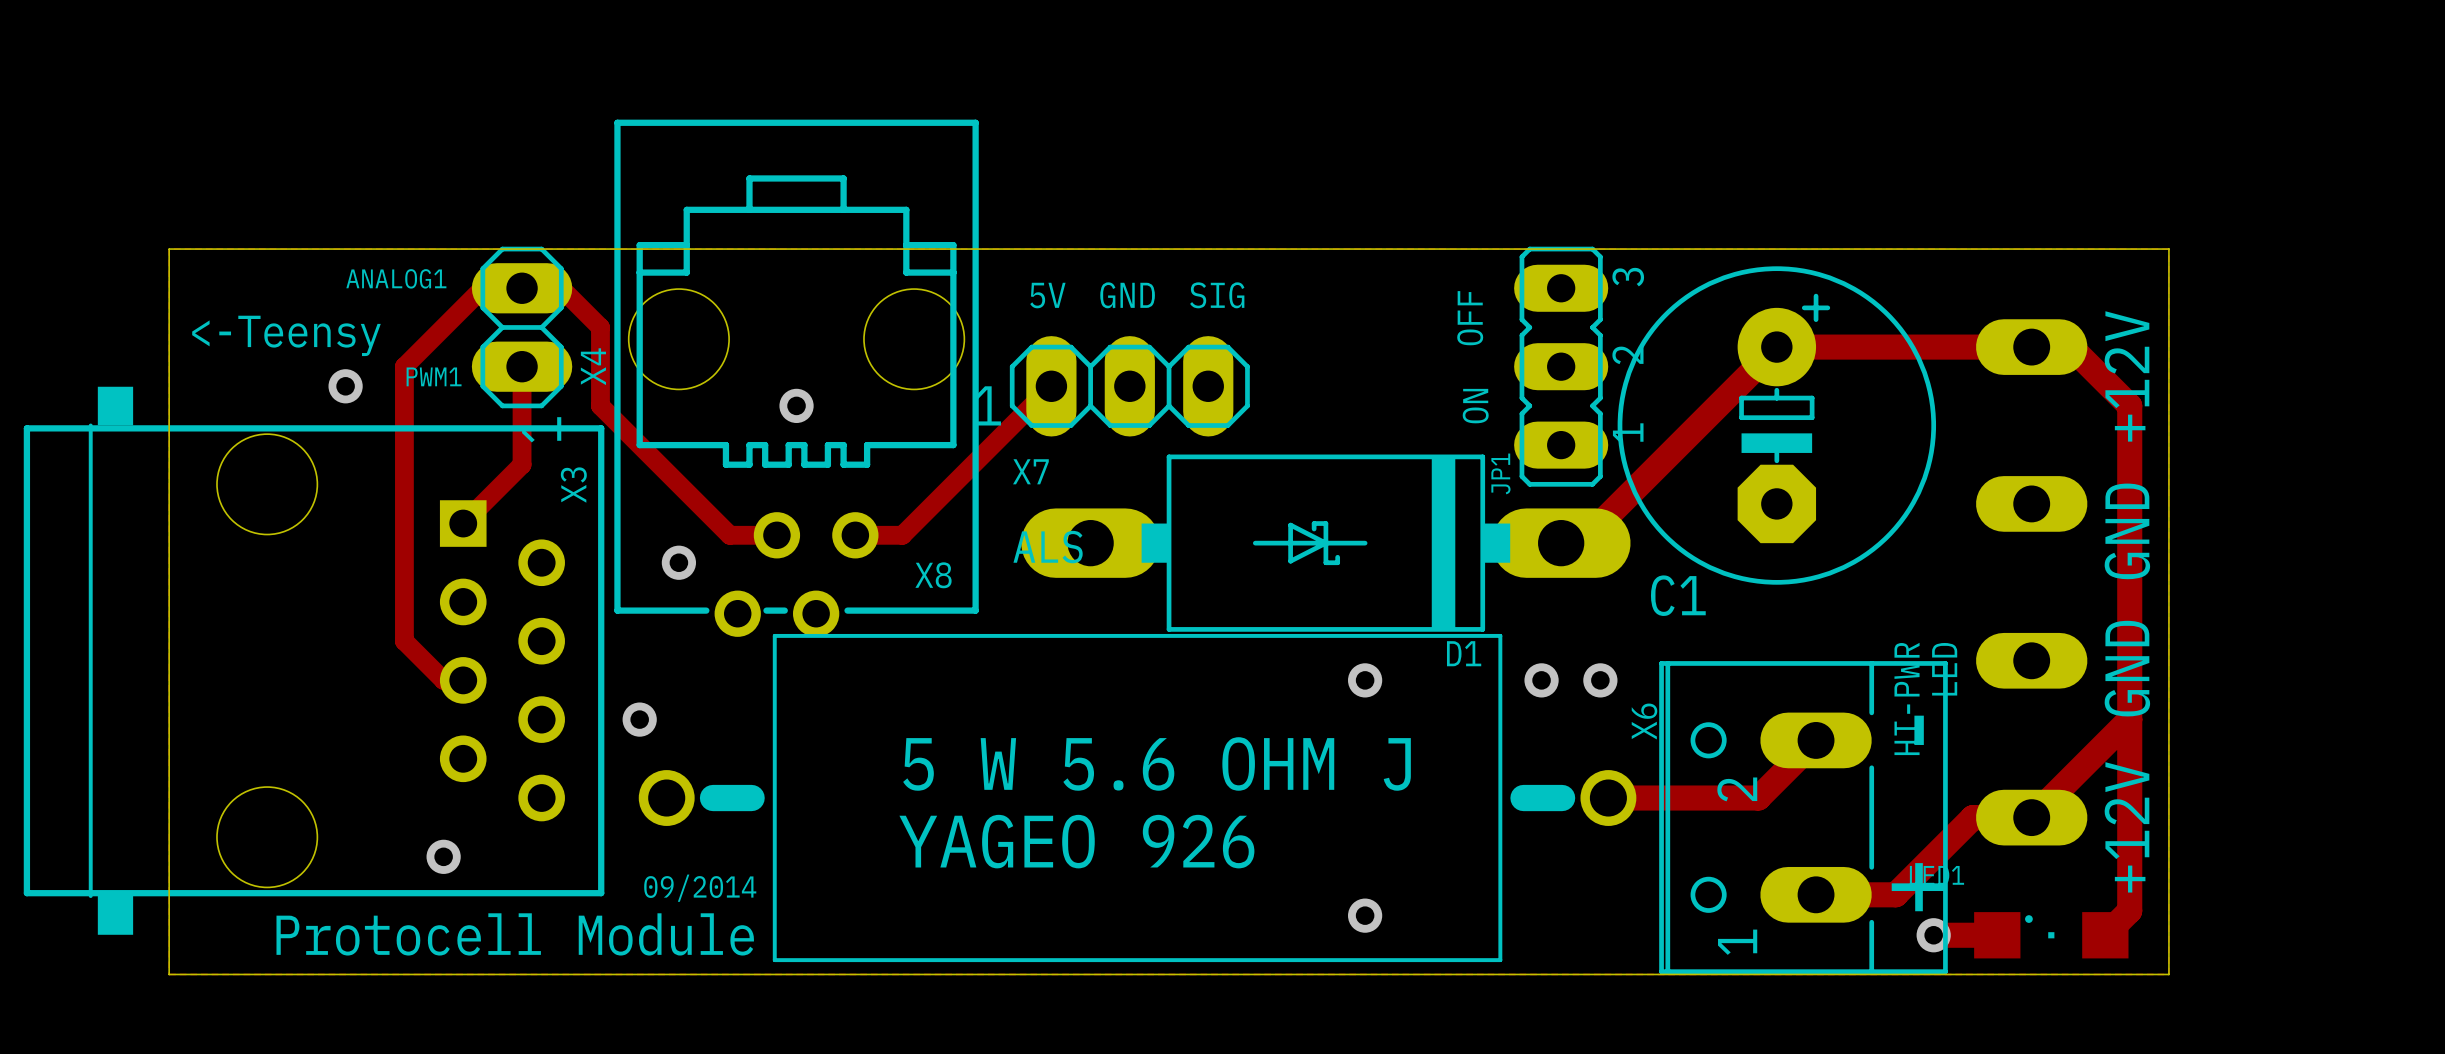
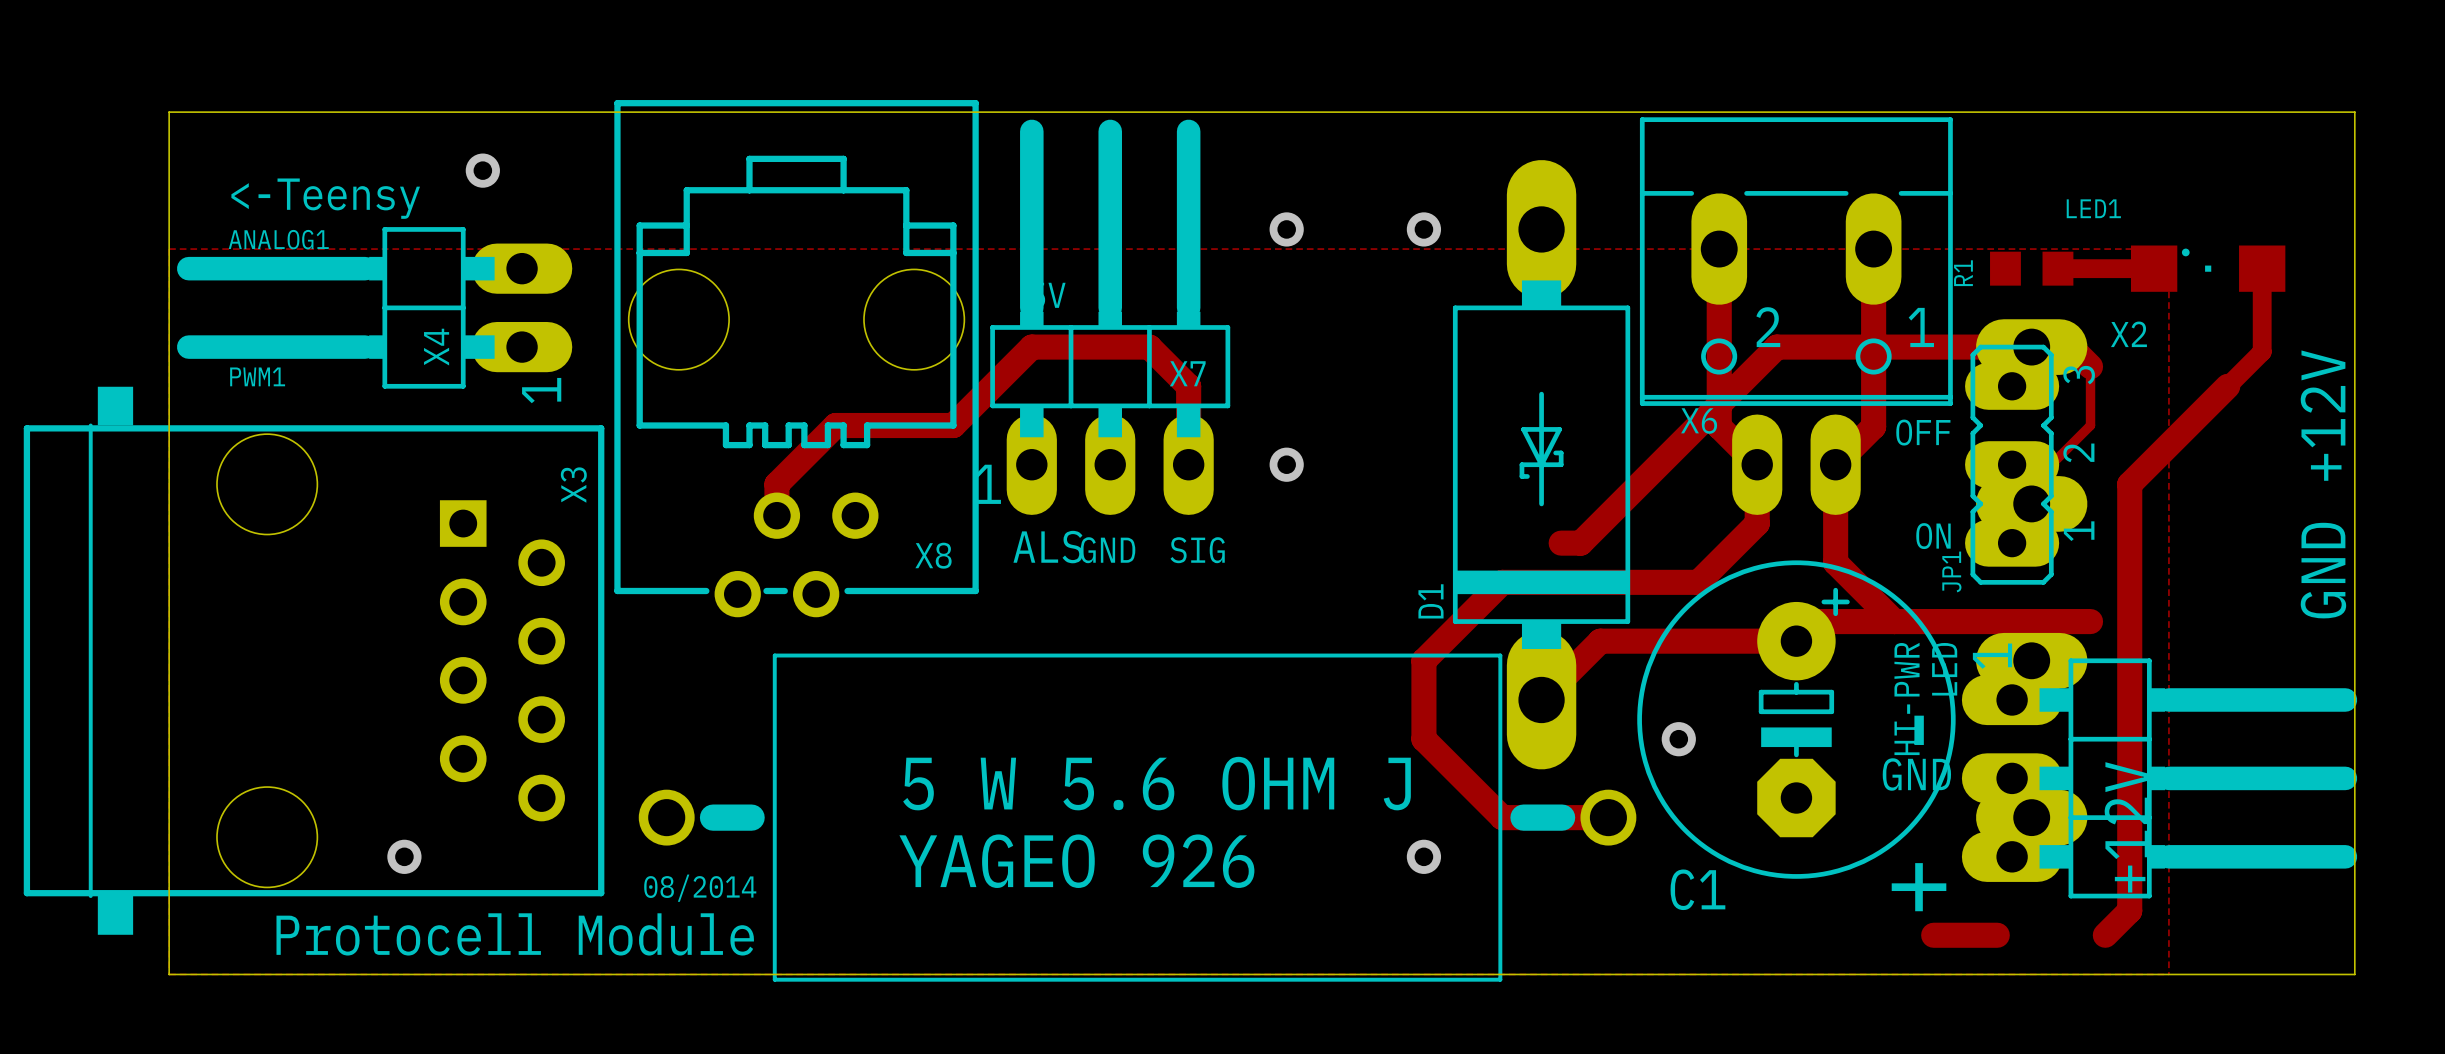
via: none -> (482, 170)
via: none -> (1286, 229)
via: none -> (1423, 229)
X4 footprint: [471, 246, 573, 409] -> [176, 227, 573, 389]
board edge: (169, 249) (2168, 249) (2168, 974) -> (169, 249) (169, 112) (2354, 112) (2354, 974) (2168, 974)
track: none -> (1719, 249) (1719, 426) (1757, 464) (1757, 523) (1698, 582) (1502, 582) (1423, 660) (1423, 739) (1502, 817) (1608, 817)
track: none -> (1873, 249) (1873, 426) (1835, 464) (1835, 562) (1894, 621)
R1: none -> (2031, 268)
track: none -> (2057, 268) (2154, 268)
track: none -> (2262, 268) (2262, 351) (2129, 484)
text position: ANALOG1 (396, 278) -> ANALOG1 (278, 239)
text position: GND (1127, 295) -> GND (1107, 550)
text position: SIG (1217, 295) -> SIG (1197, 550)
text rotation: 0° (1470, 318) -> 90° clockwise (1923, 432)
text position: OFF (1470, 318) -> OFF (1923, 432)
text position: <-Teensy (286, 335) -> <-Teensy (325, 198)
X7 footprint: [1009, 336, 1250, 437] -> [990, 119, 1231, 515]
track: (522, 366) (522, 464) (463, 523) -> none
JP1 position: (1561, 366) -> (2012, 464)
track: (2090, 366) (2129, 405) (2129, 484) -> (2090, 366) (2090, 425) (2051, 464) (2012, 464)
text position: PWM1 (434, 376) -> PWM1 (257, 376)
text position: +12V (2127, 376) -> +12V (2323, 415)
X8 position: (796, 378) -> (796, 358)
via: (345, 386) -> none
track: (1051, 386) (902, 535) (855, 535) -> none
via: (796, 405) -> none
text rotation: 0° (1475, 406) -> 90° clockwise (1933, 536)
text position: ON (1475, 406) -> ON (1933, 536)
C1 position: (1776, 425) -> (1796, 719)
track: none -> (1188, 464) (1188, 386) (1149, 347) (1031, 347) (953, 425) (835, 425) (776, 484) (776, 515)
via: none -> (1286, 464)
part: none -> (1796, 464)
X7 name position: X7 (1030, 471) -> X7 (1187, 373)
text: GND (2127, 531) -> none
track: (776, 535) (729, 535) (600, 405) (600, 327) (561, 288) (482, 288) (404, 366) (404, 641) (443, 680) (463, 680) -> none
D1 rotation: 0° (1325, 543) -> 90° clockwise (1541, 464)
via: (678, 562) -> none
text: none -> GND (2323, 570)
track: none -> (2090, 621) (1816, 621) (1796, 641) (1600, 641) (1541, 699)
X6 footprint: [1659, 661, 1948, 975] -> [1639, 117, 1953, 406]
text: GND (2127, 668) -> none
via: (1365, 680) -> none
via: (1541, 680) -> none
via: (1600, 680) -> none
via: (639, 719) -> none
track: (2129, 719) (2031, 817) (1972, 817) (1895, 894) (1816, 894) -> none
X6 name position: X6 (1644, 721) -> X6 (1699, 421)
via: none -> (1678, 739)
track: (1816, 740) (1758, 798) (1608, 798) -> none
text: none -> GND (1916, 774)
X2: none -> (2159, 778)
part position: (1137, 798) -> (1137, 817)
via position: (443, 856) -> (404, 856)
text: 09/2014 (700, 888) -> 08/2014 (700, 888)
via position: (1365, 915) -> (1423, 856)
via: (1933, 935) -> none
LED1 position: (2051, 935) -> (2208, 268)

